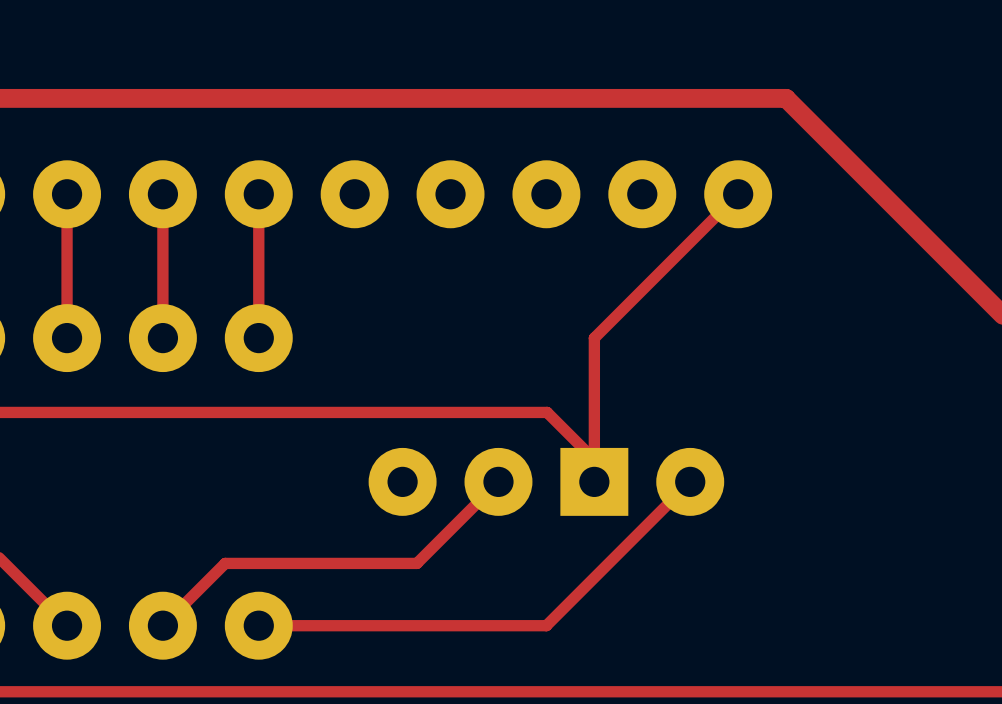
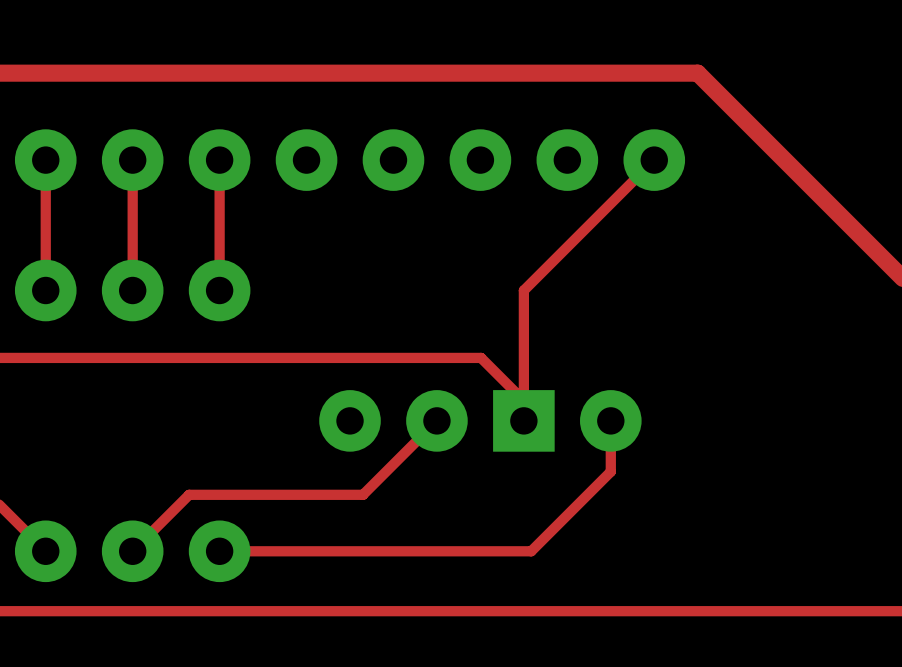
top track: (690, 481) (546, 625) -> (610, 420) (610, 471) (531, 551) (480, 551)

